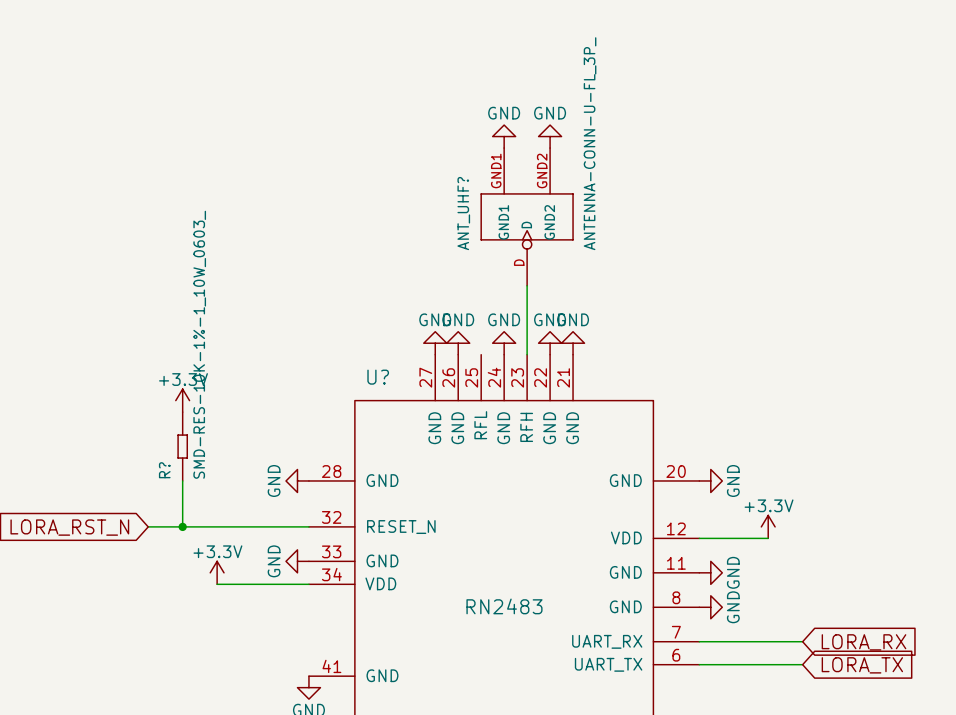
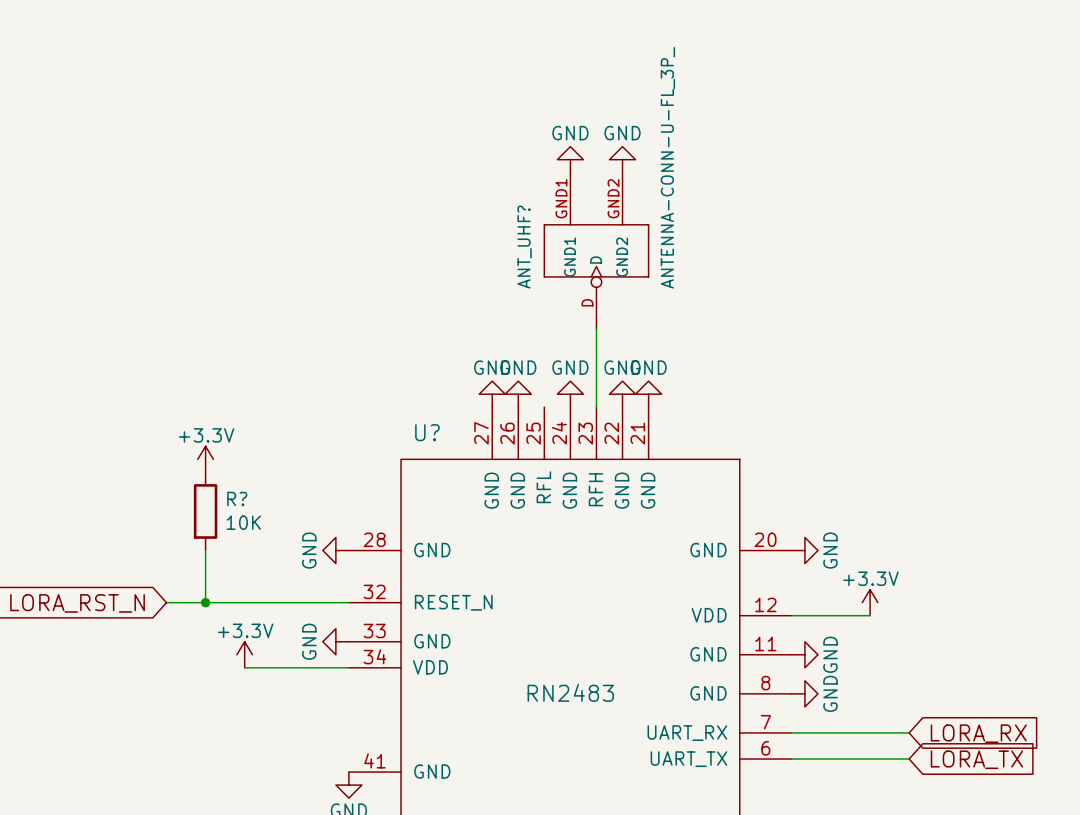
R? value: SMD-RES-10K-1%-1_10W_0603_ (199, 344) -> 10K (243, 522)
R? symbol: [178, 412, 188, 481] -> [193, 472, 218, 551]
R? name position: R? (164, 470) -> R? (237, 498)

